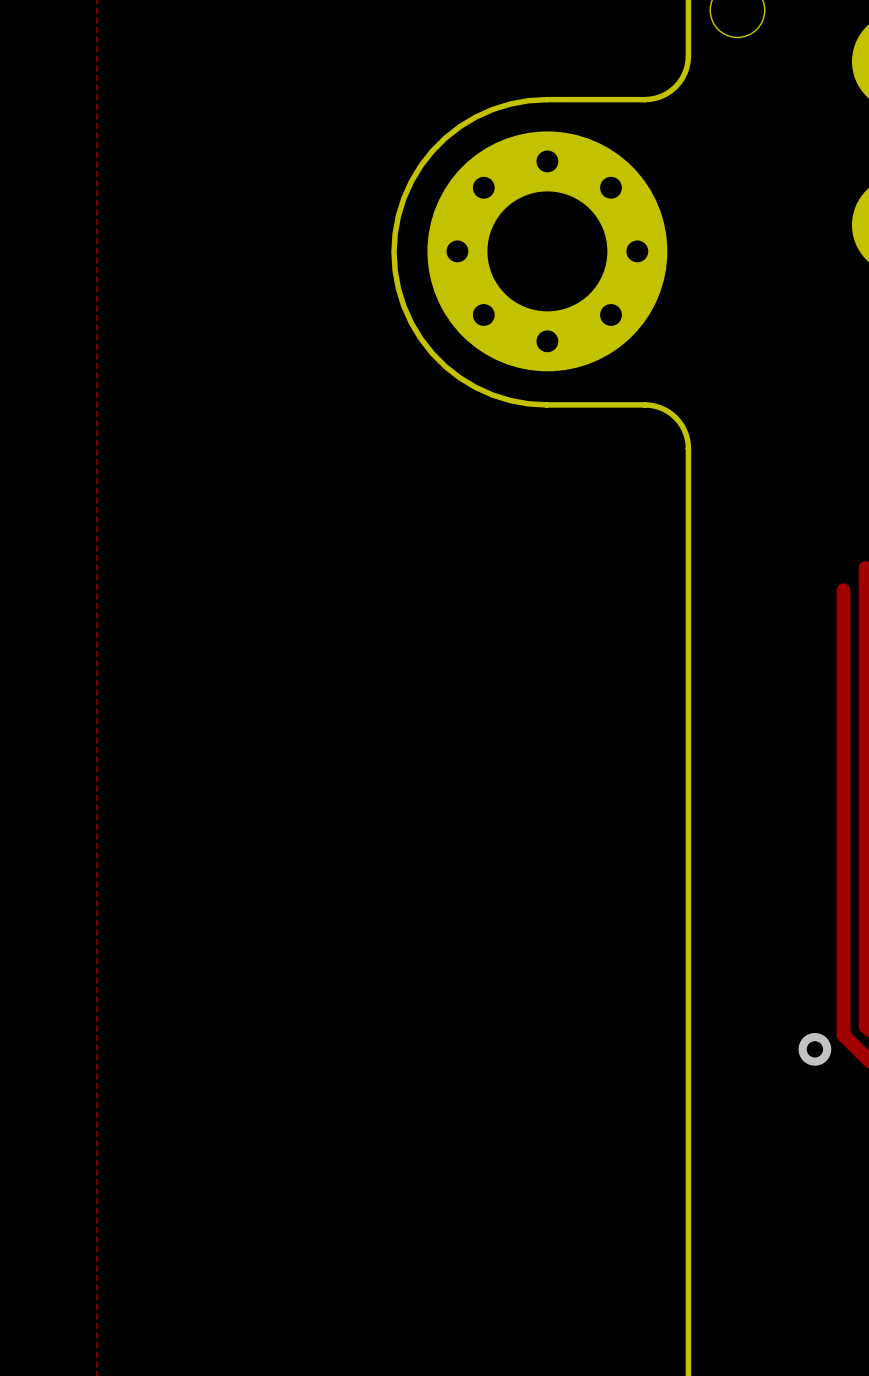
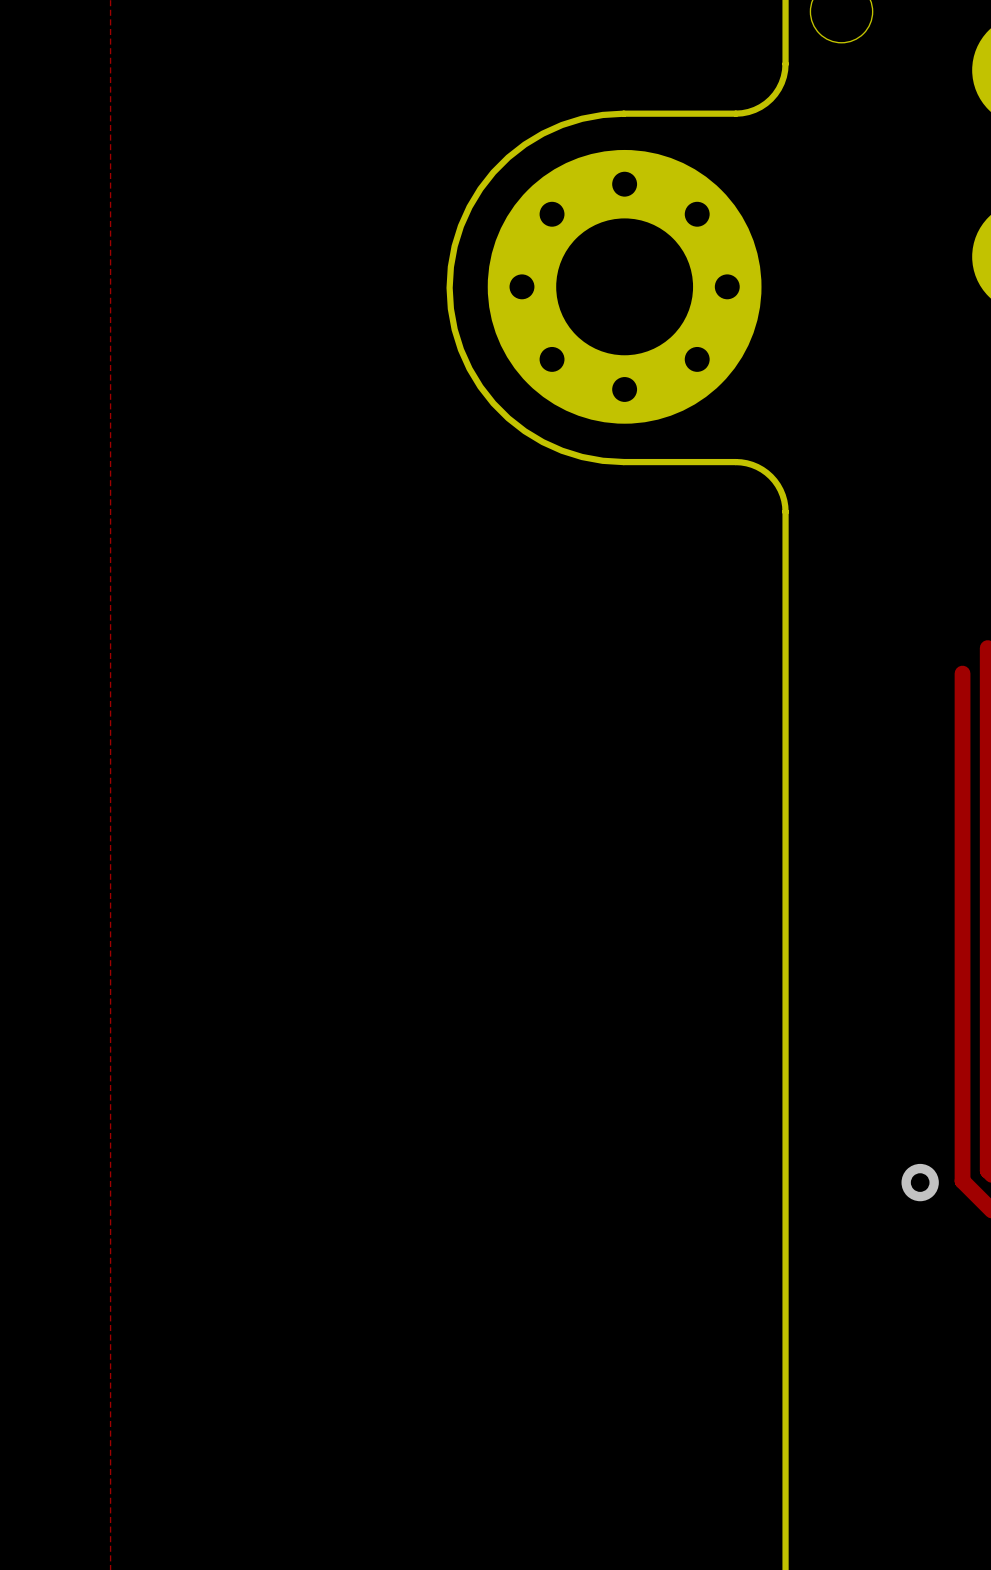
via position: (814, 1049) -> (920, 1182)

